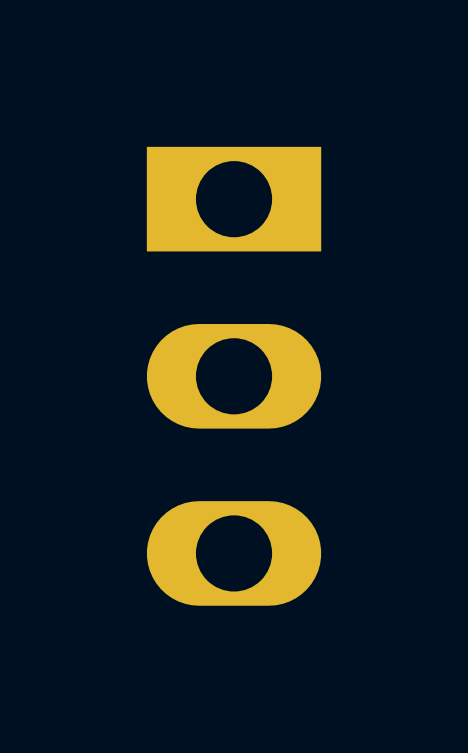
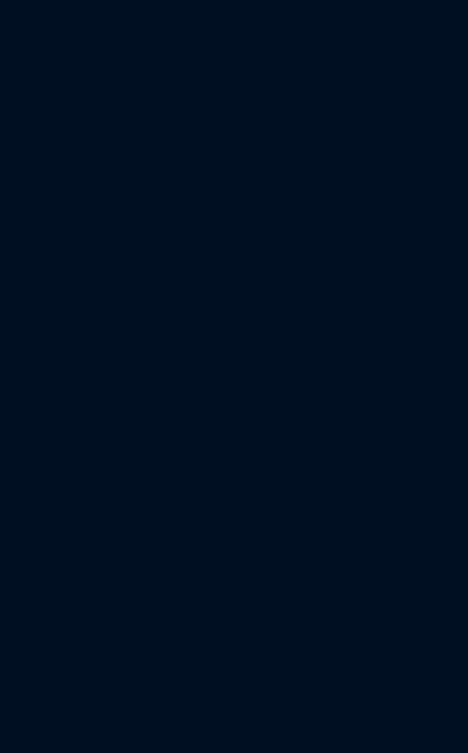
part: (234, 376) -> none

